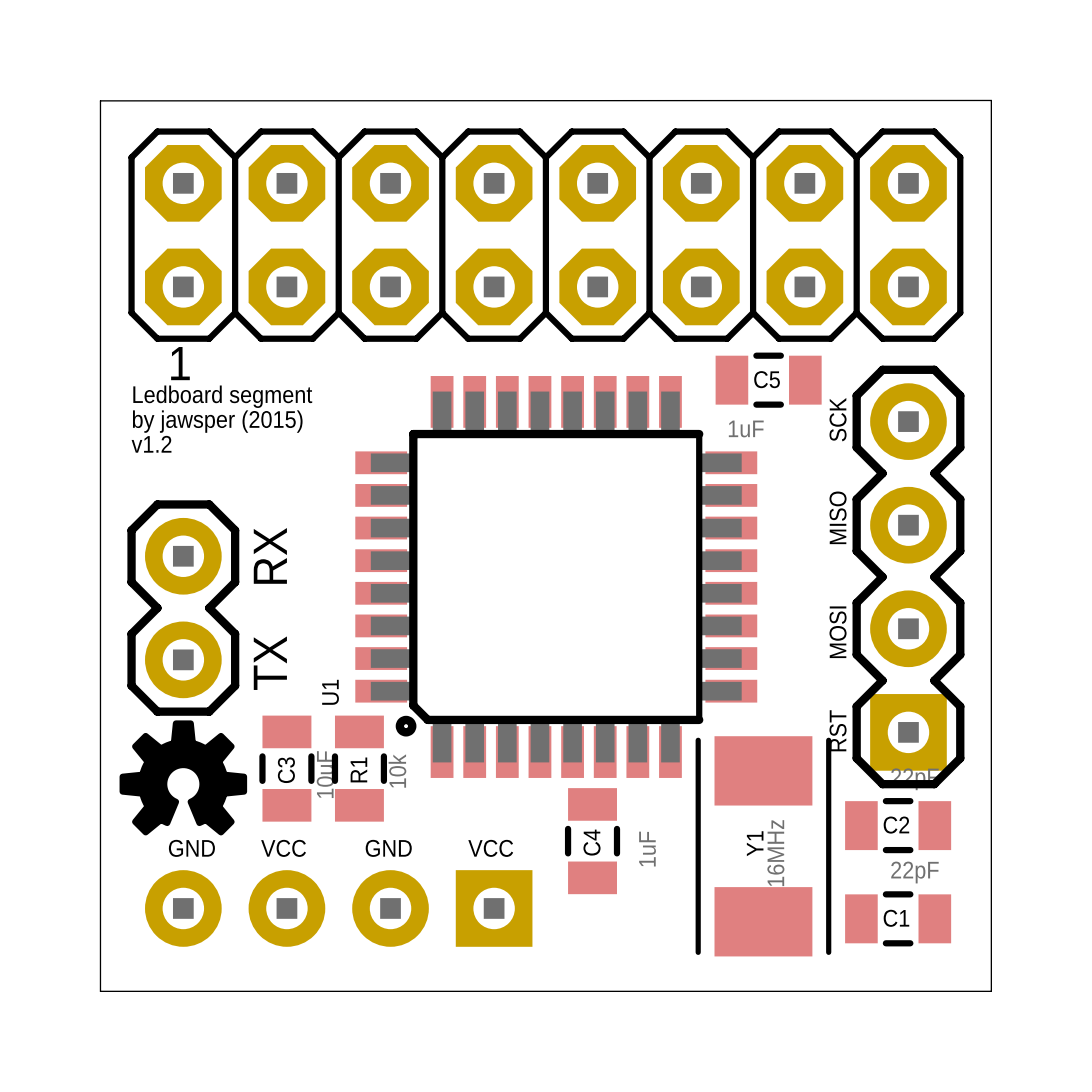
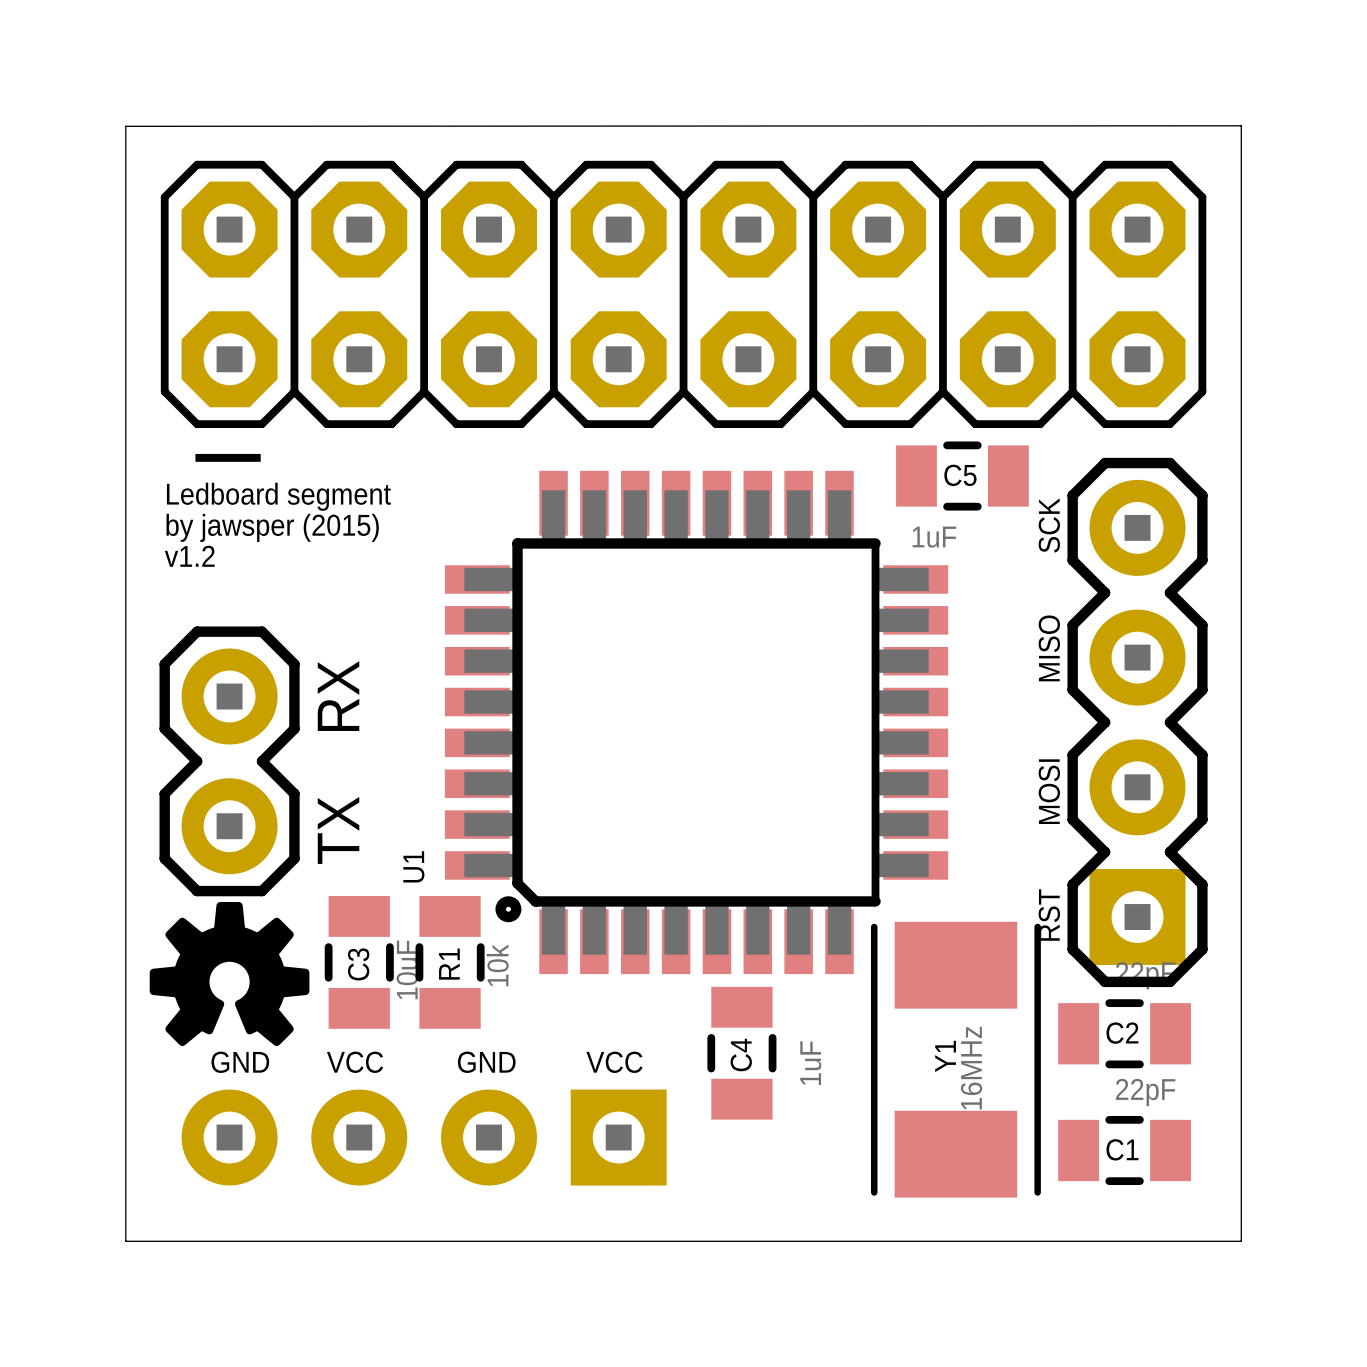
text: 1 (180, 363) -> _ (228, 457)

